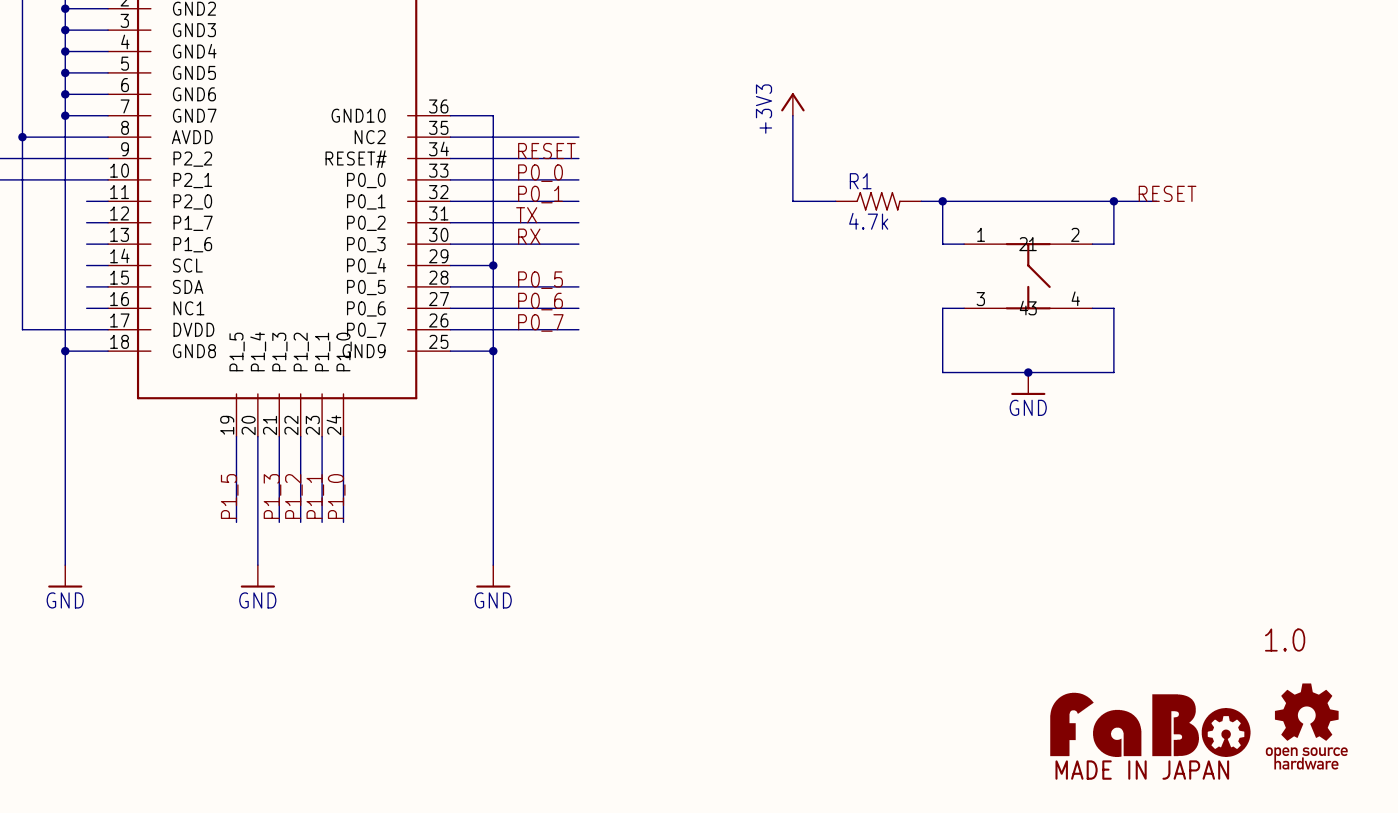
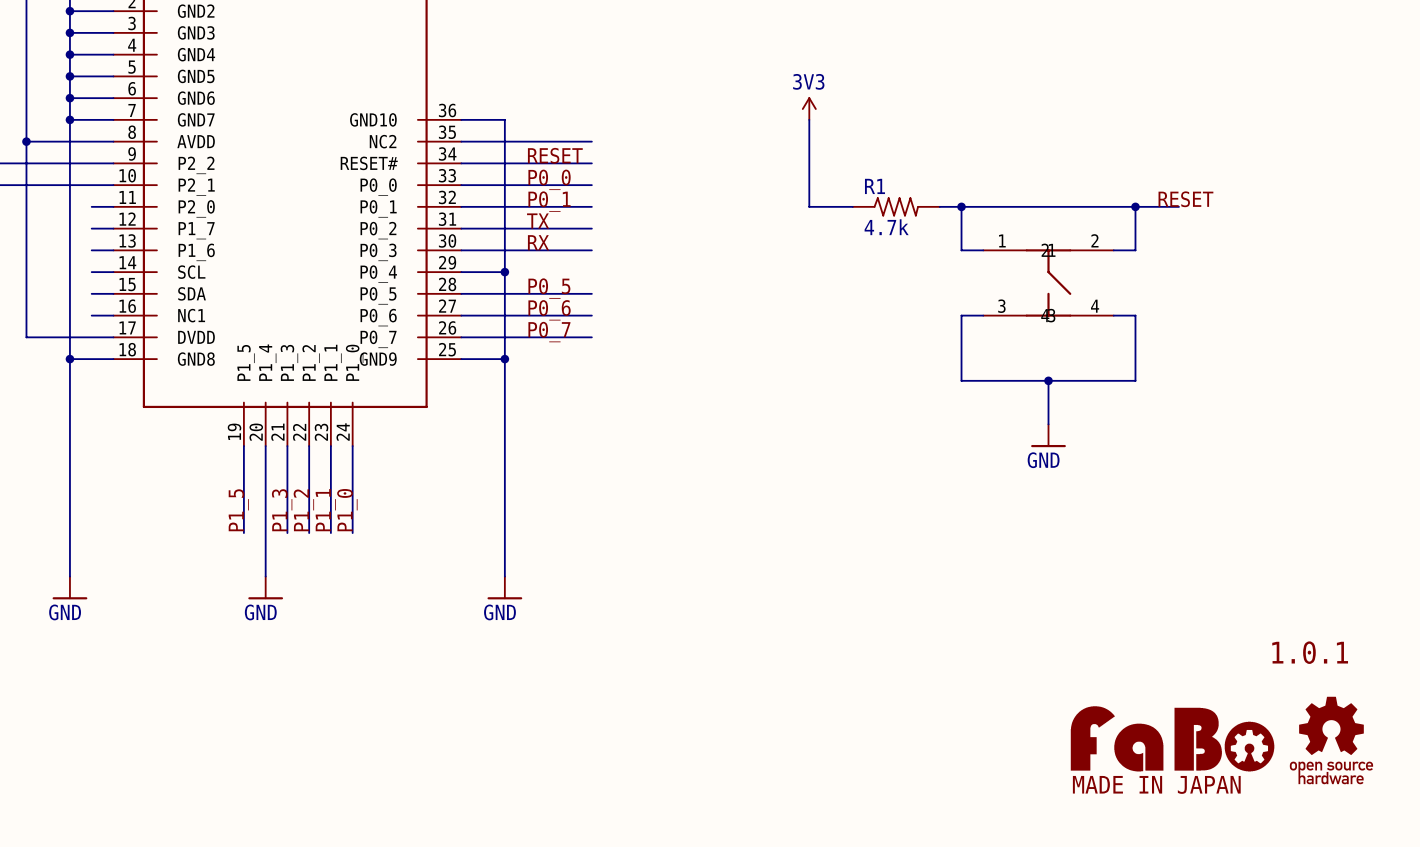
power symbol: +3V3 (792, 104) -> 3V3 (809, 108)
power symbol position: GND (1028, 383) -> GND (1048, 435)
text: 1.0 (1285, 640) -> 1.0.1 (1310, 652)

